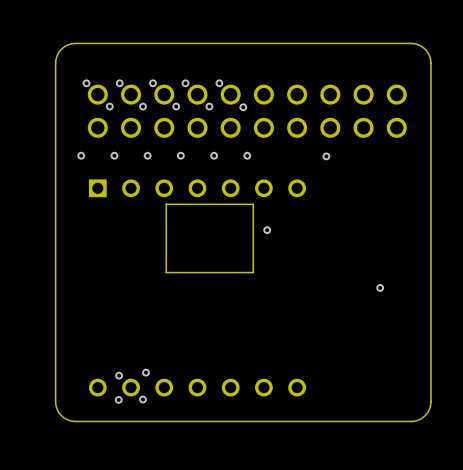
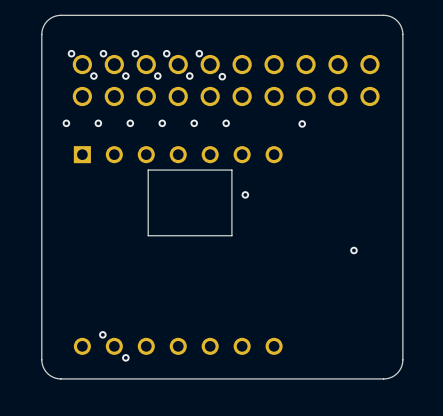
via: (145, 372) -> none
via: (118, 399) -> none

